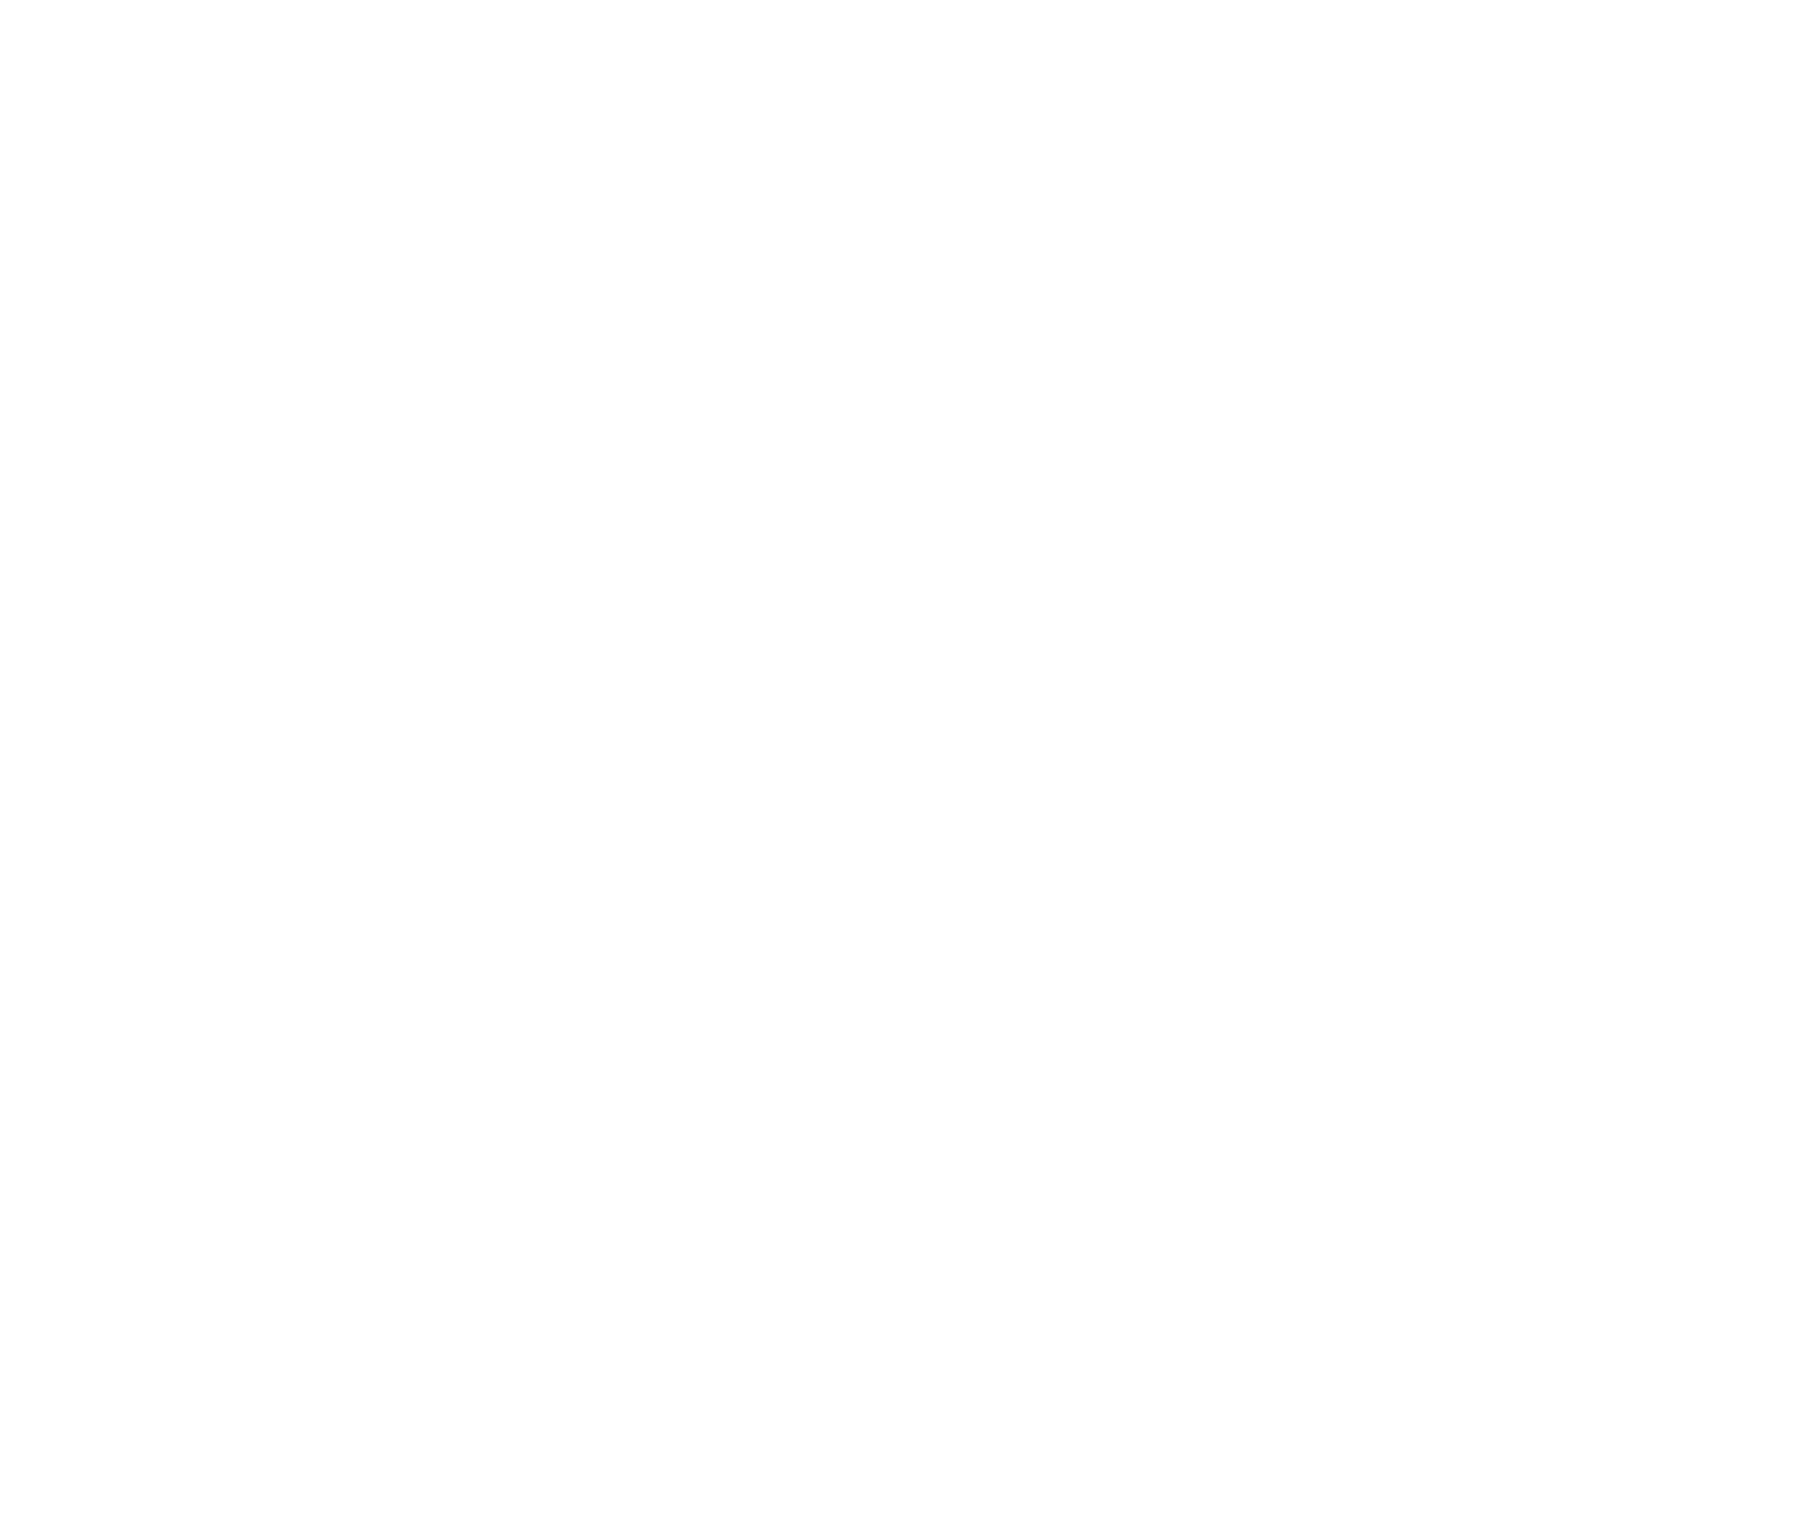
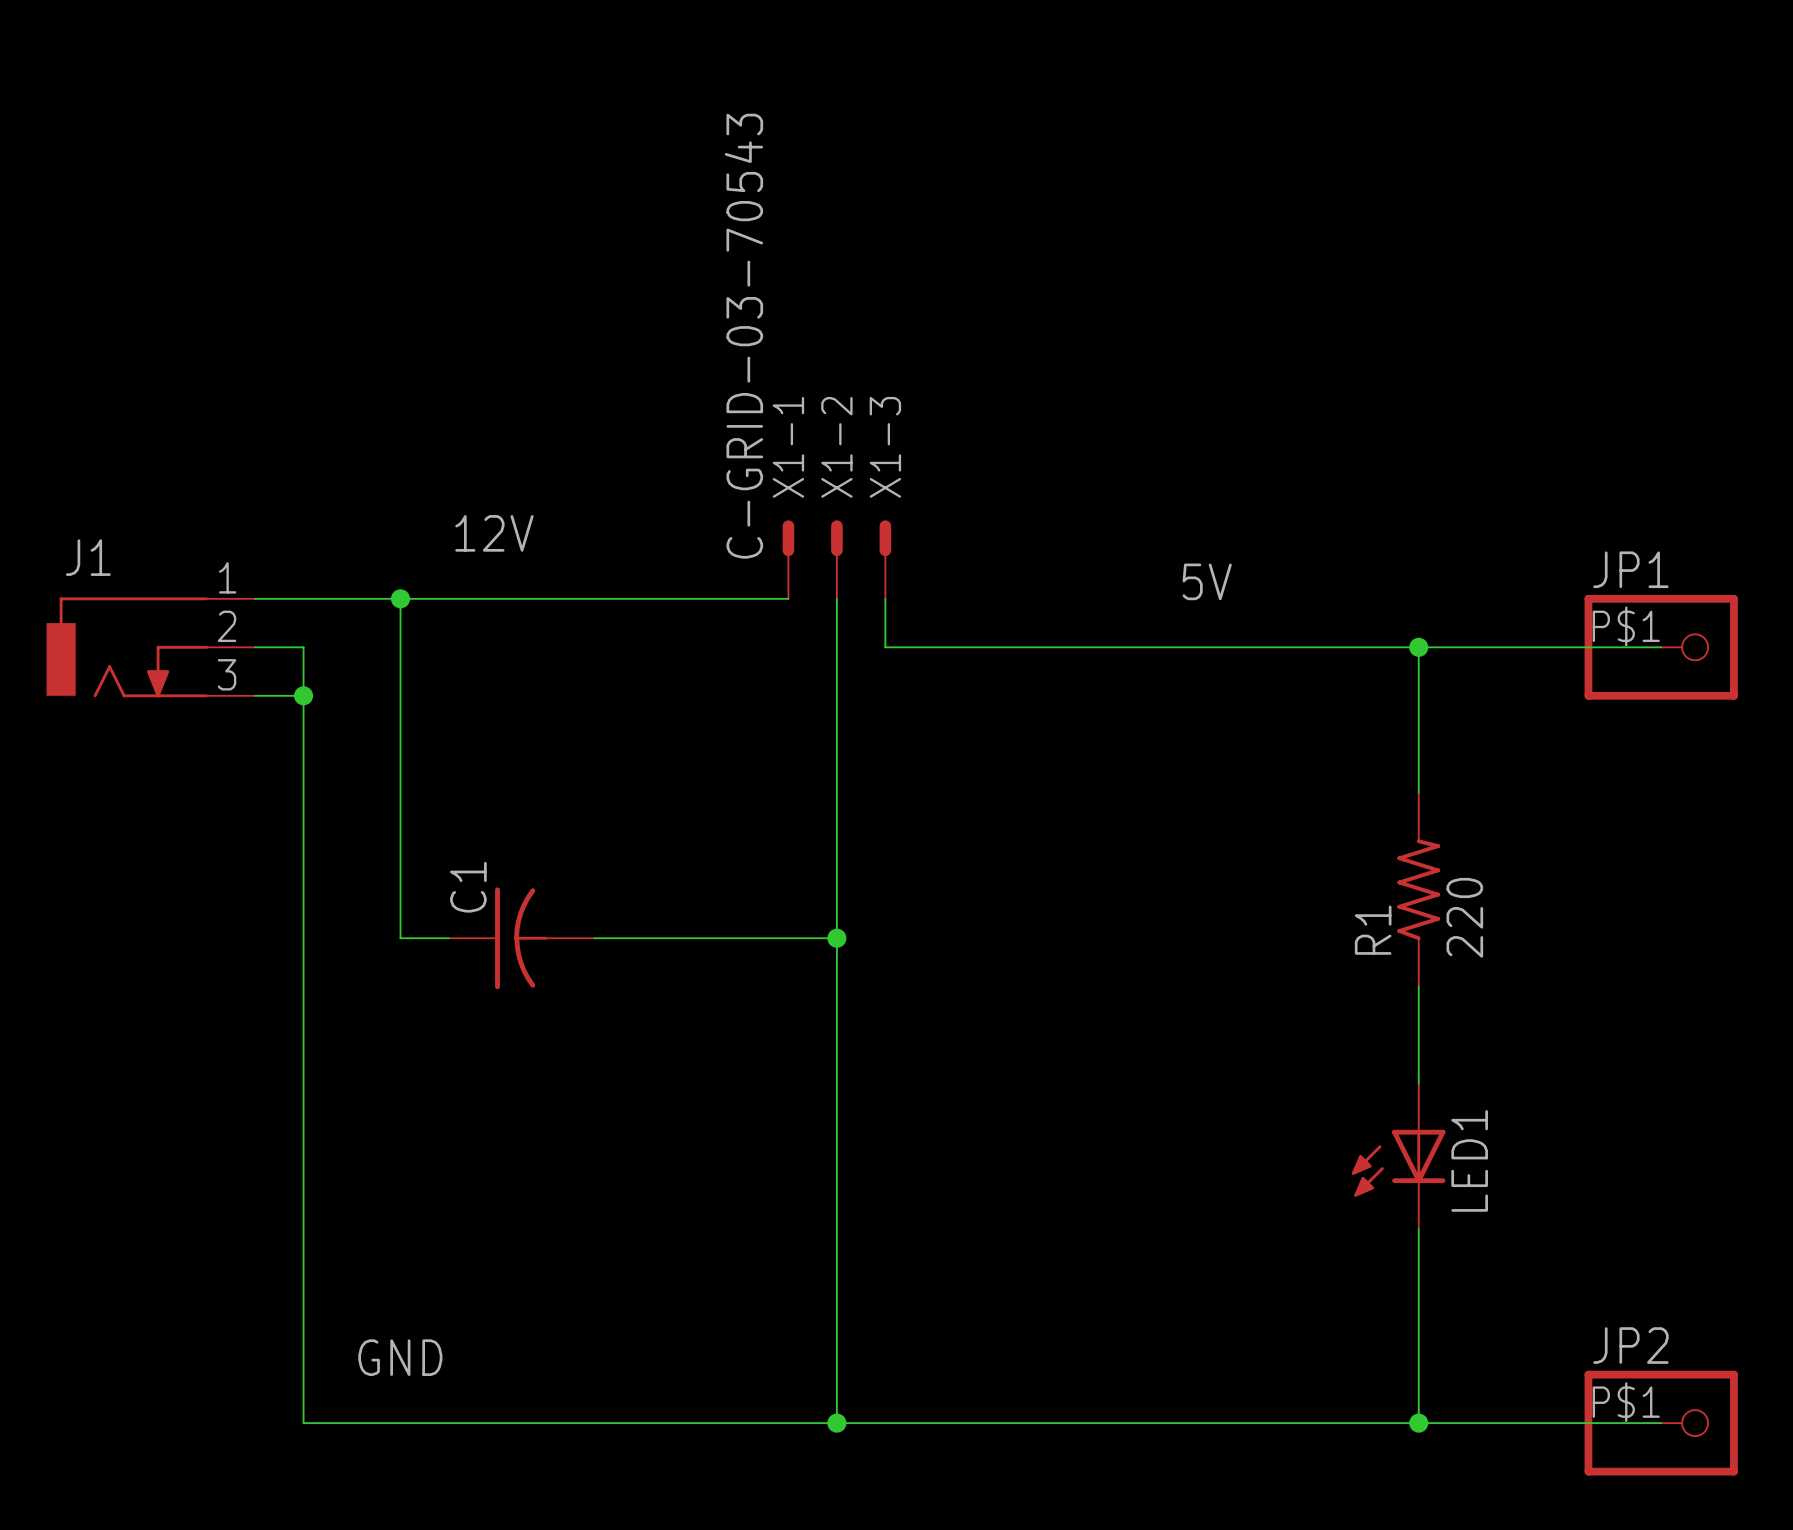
label: none -> 12V (494, 533)
X1-1: none -> C-GRID-03-70543 (788, 559)
X1-2: none -> (836, 559)
X1-3: none -> (885, 559)
label: none -> 5V (1207, 581)
wire: none -> (255, 598) (788, 598)
wire: none -> (400, 598) (400, 938) (449, 938)
junction: none -> (400, 598)
wire: none -> (836, 598) (836, 1423)
wire: none -> (885, 598) (885, 647) (1661, 647)
J1: none -> (150, 647)
wire: none -> (255, 647) (303, 647) (303, 1423) (1661, 1423)
wire: none -> (1418, 647) (1418, 792)
junction: none -> (1418, 647)
JP1: none -> (1661, 647)
wire: none -> (255, 695) (303, 695)
junction: none -> (303, 695)
R1: none -> 220 (1418, 889)
C1: none -> (521, 938)
wire: none -> (594, 938) (836, 938)
junction: none -> (836, 938)
wire: none -> (1418, 986) (1418, 1083)
LED1: none -> (1398, 1156)
wire: none -> (1418, 1229) (1418, 1423)
label: none -> GND (400, 1357)
junction: none -> (836, 1423)
junction: none -> (1418, 1423)
JP2: none -> (1661, 1423)

